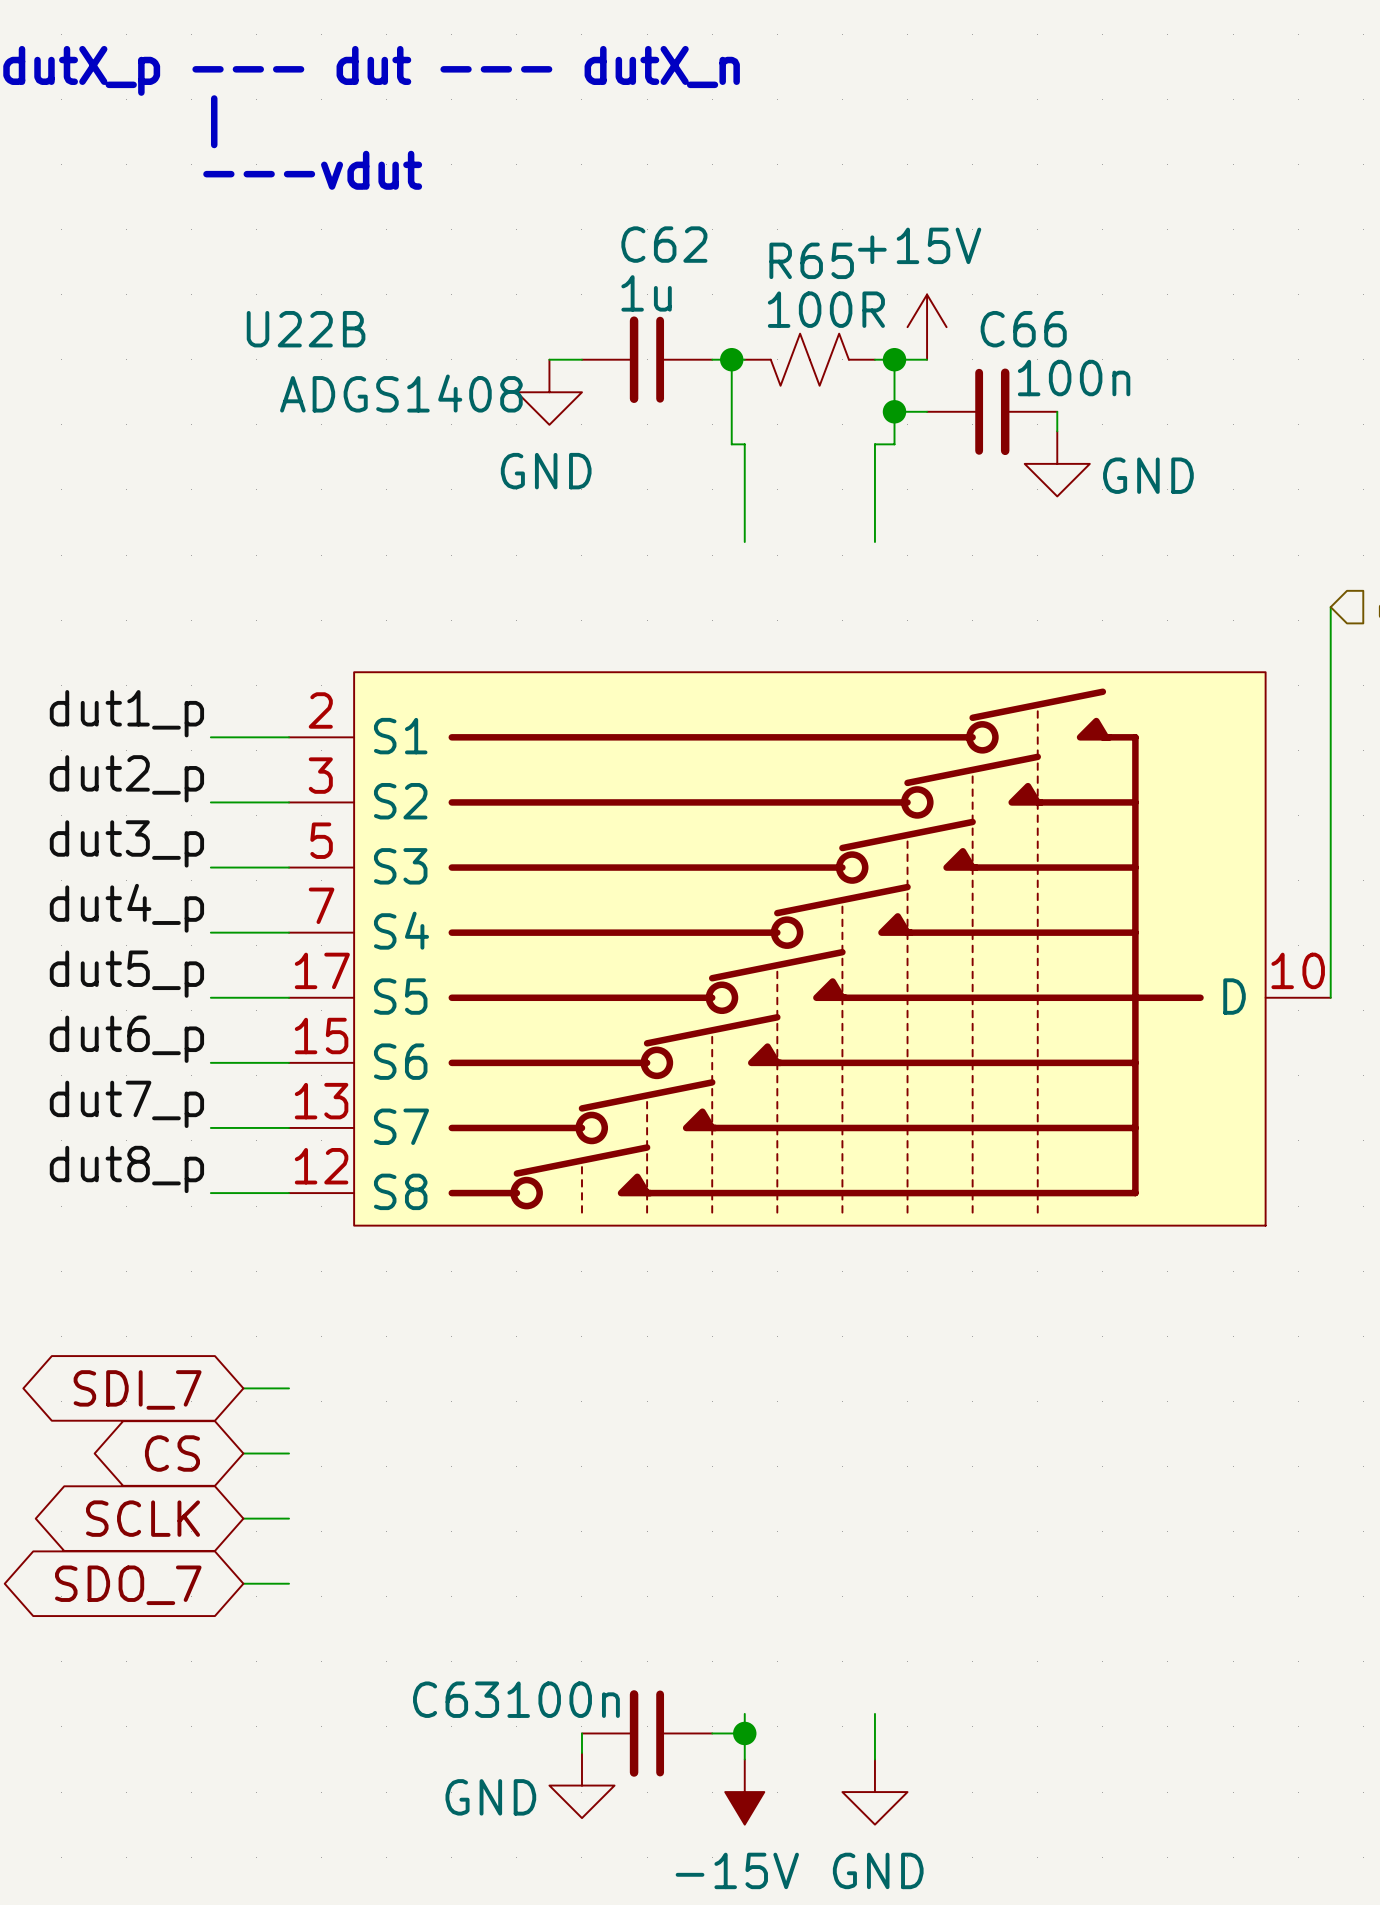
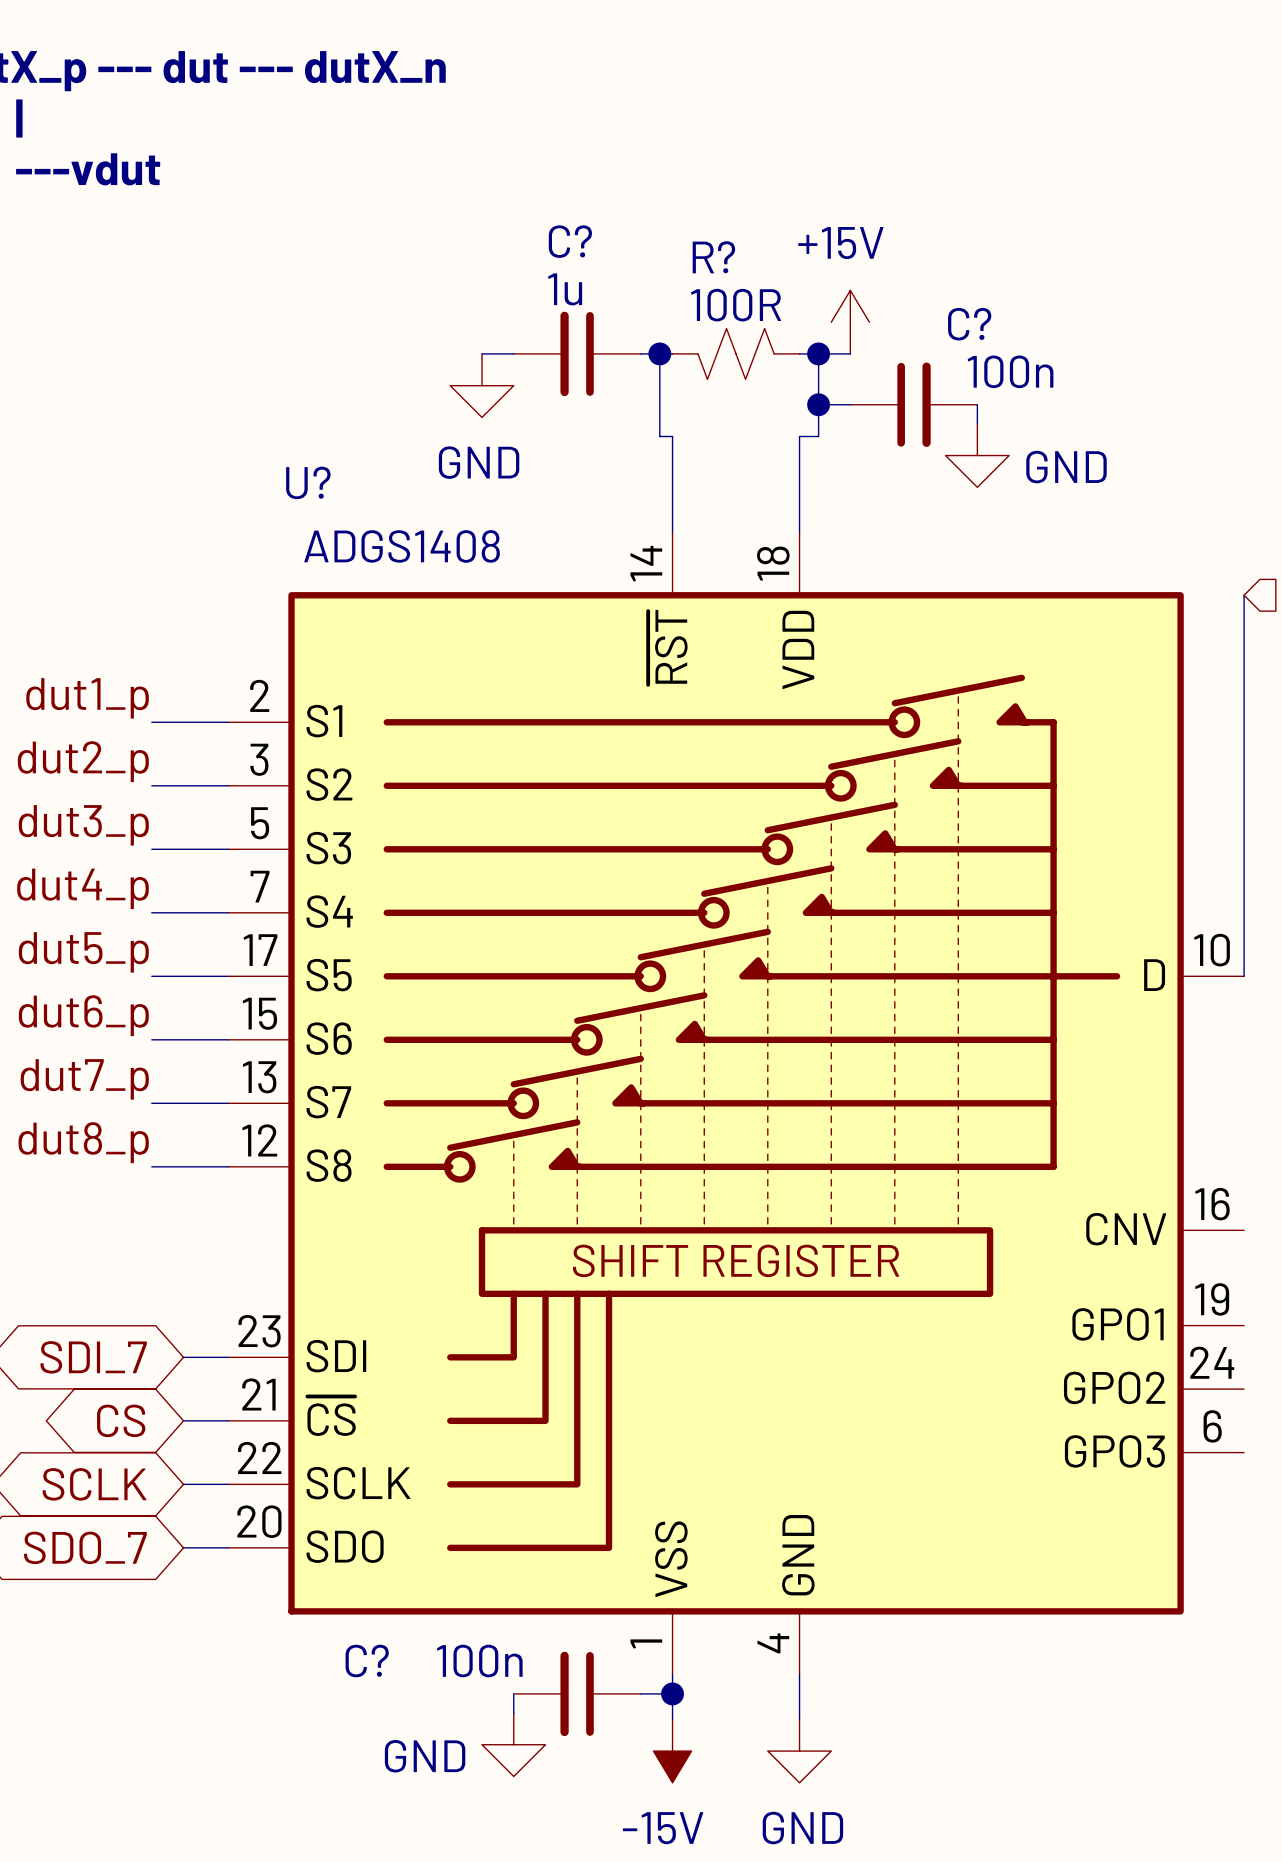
C62 name: C62 (664, 244) -> C? (570, 241)
R65 name: R65 (811, 260) -> R? (713, 257)
C66 name: C66 (1023, 329) -> C? (969, 324)
U22B: ADGS1408 (809, 948) -> none
U?: none -> ADGS1408 (736, 1103)
C63 name: C63 (456, 1699) -> C? (367, 1660)

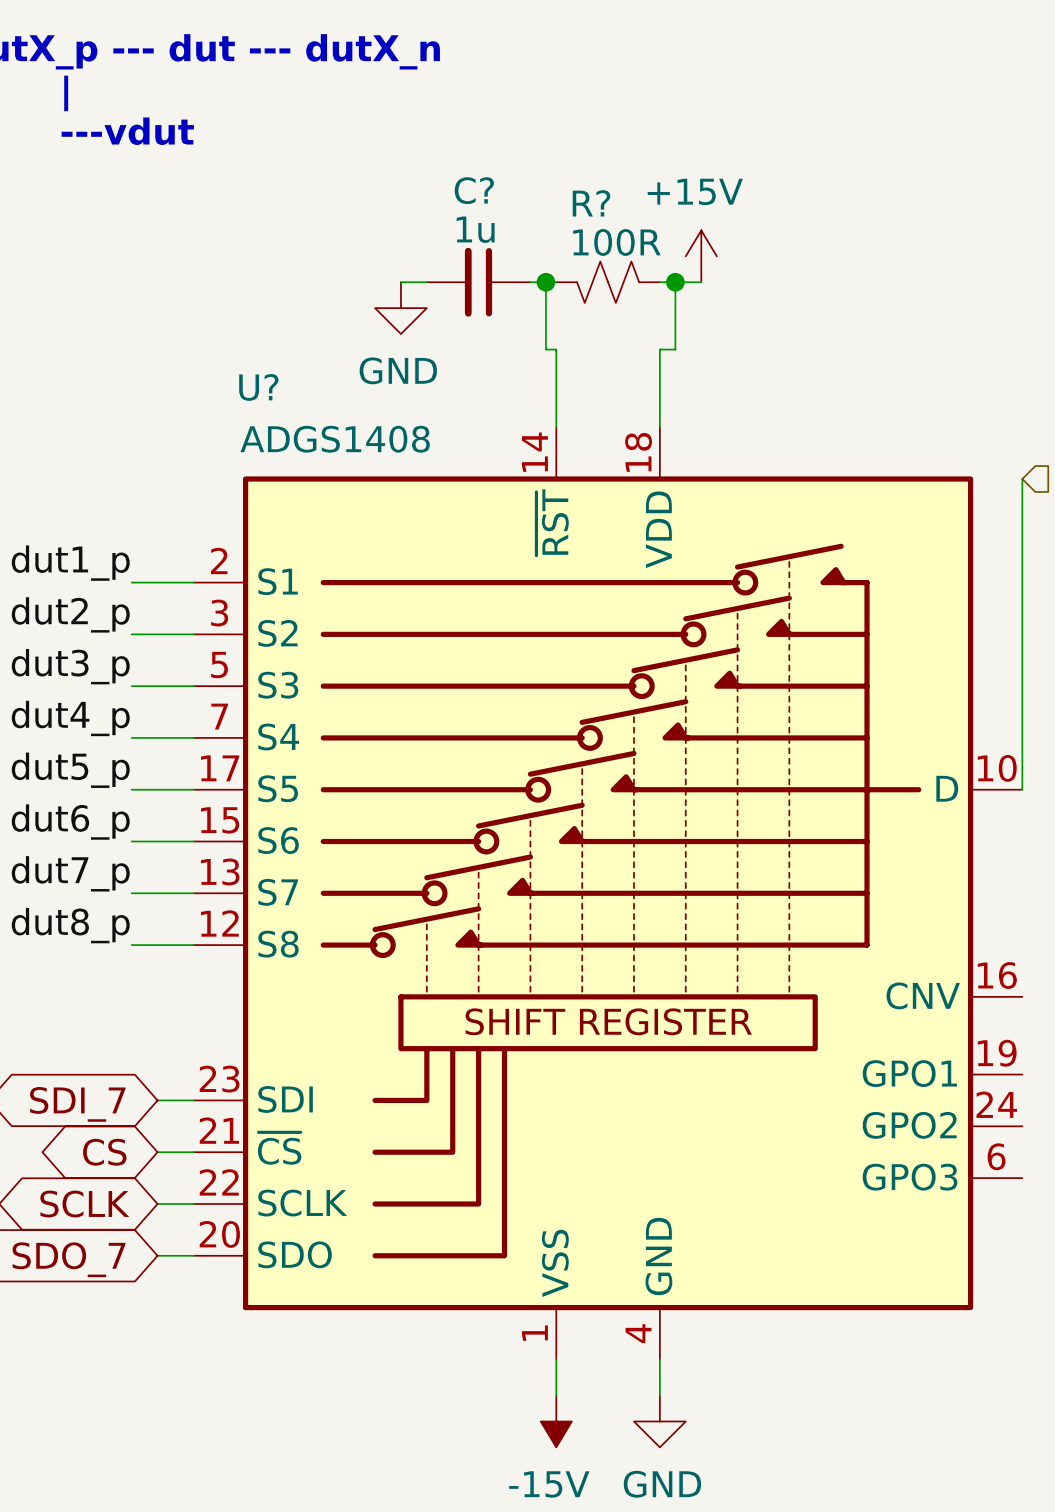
wire: (818, 404) (850, 404) -> none
junction: (818, 404) -> none
C?: 100n (913, 404) -> none
wire: (977, 404) (977, 423) -> none
power symbol: GND (977, 455) -> none
wire: (513, 1693) (513, 1712) -> none
C?: 100n (577, 1693) -> none
wire: (640, 1693) (672, 1693) -> none
junction: (672, 1693) -> none
power symbol: GND (513, 1744) -> none

